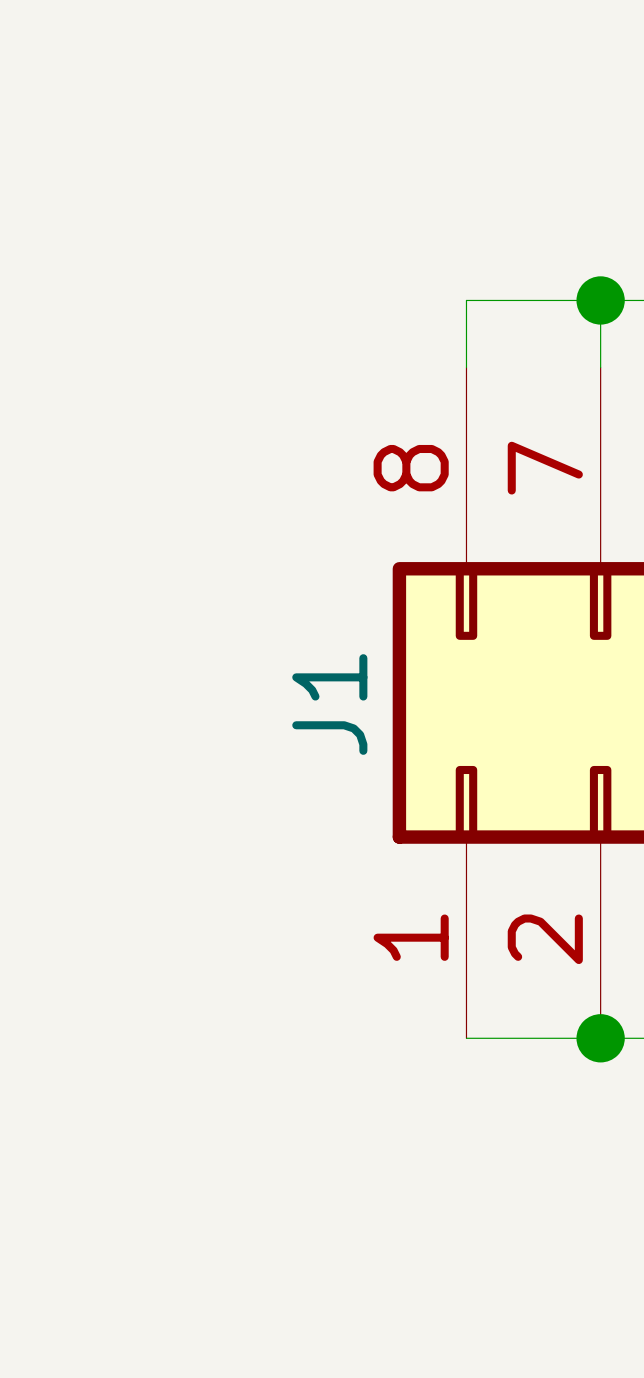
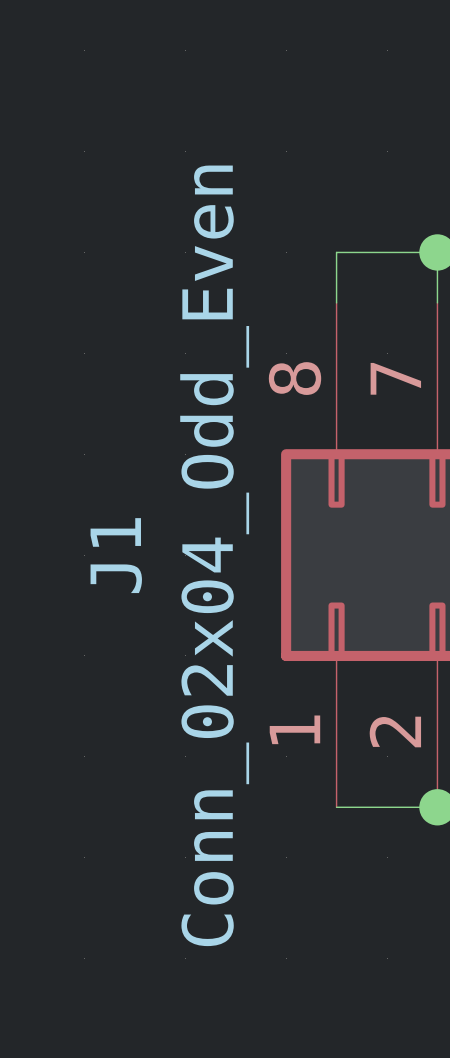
J1 value: none -> Conn_02x04_Odd_Even (214, 555)
J1 name position: J1 (329, 704) -> J1 (116, 555)

